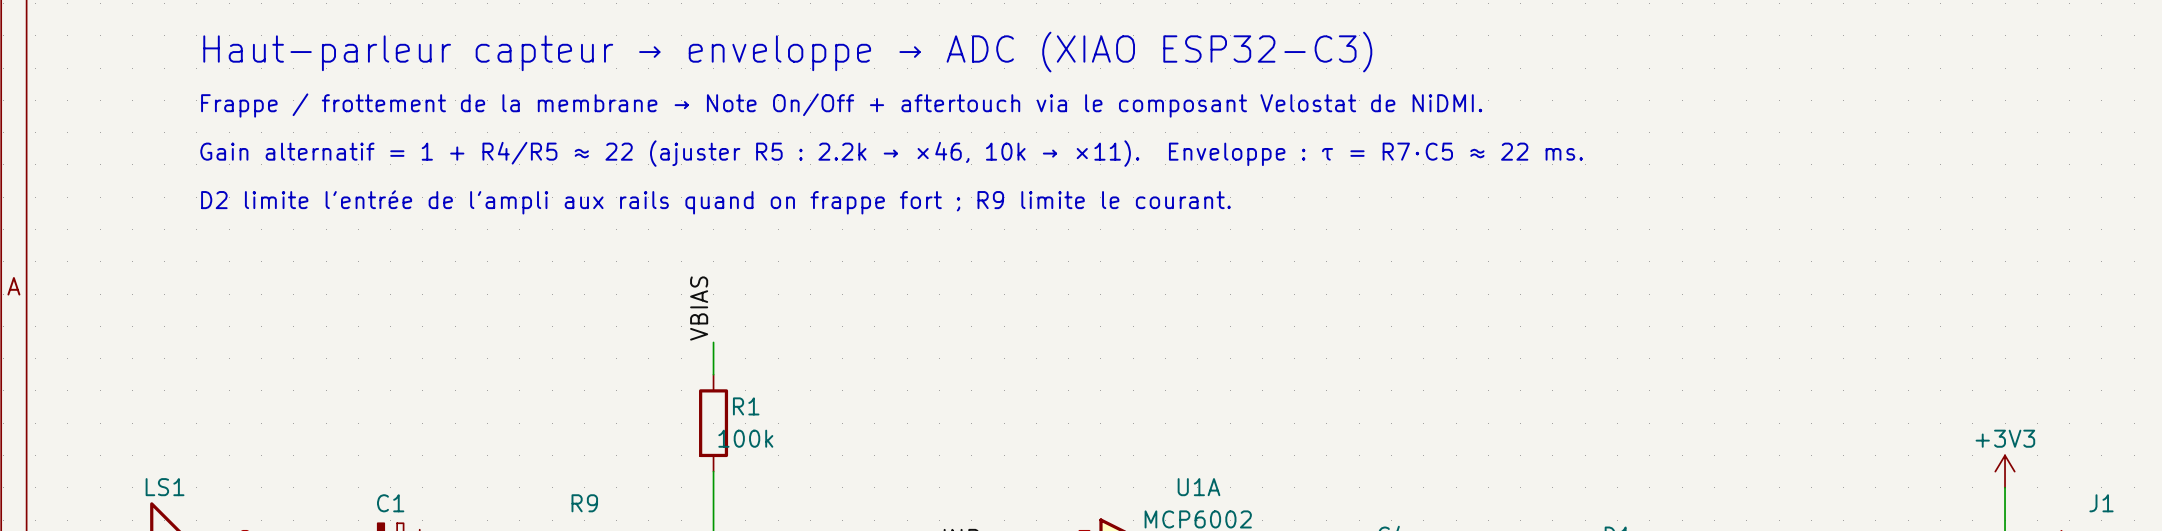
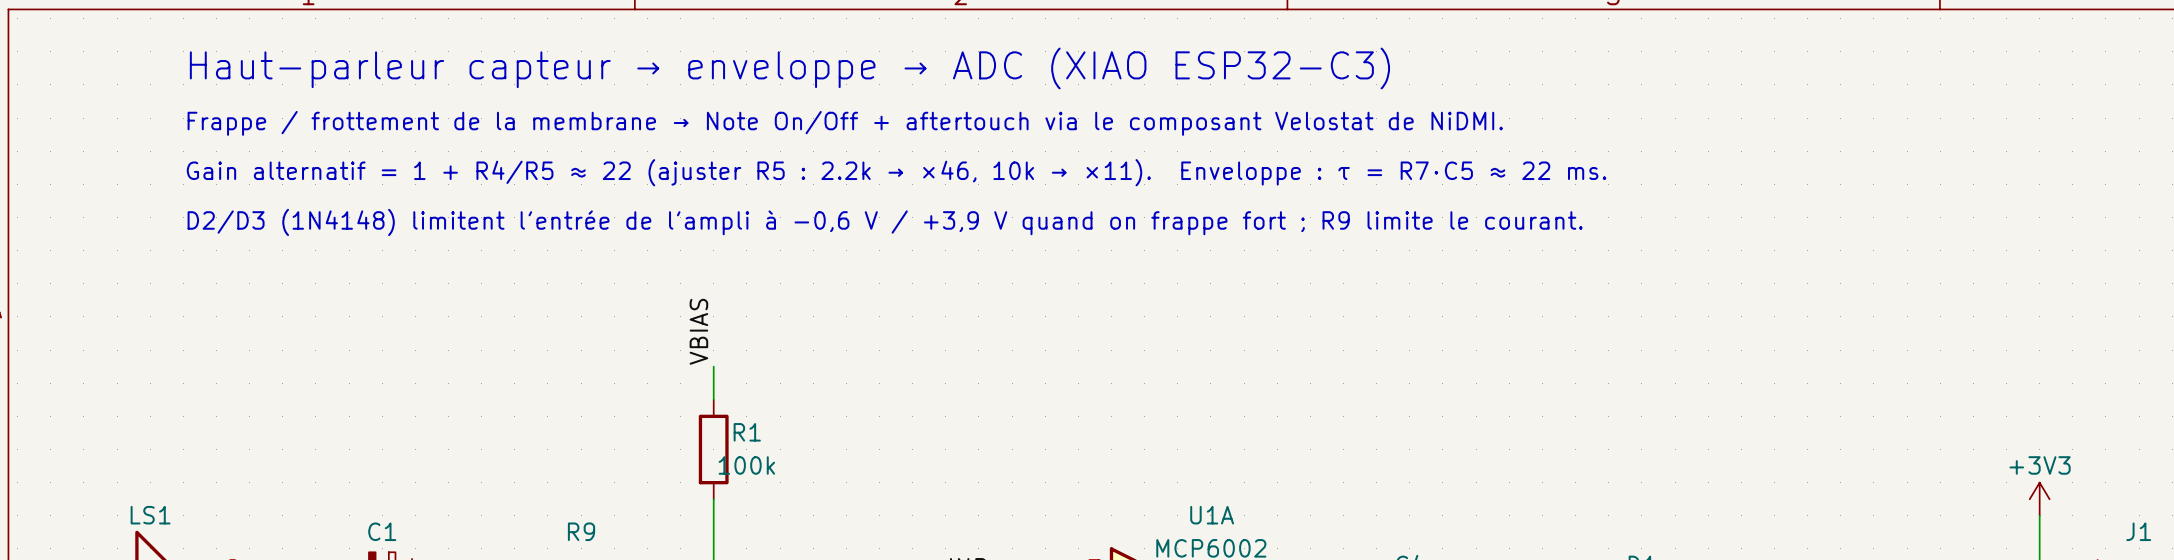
text: D2 limite l'entrée de l'ampli aux rails quand on frappe fort ; R9 limite le courant. (715, 202) -> D2/D3 (1N4148) limitent l'entrée de l'ampli à −0,6 V / +3,9 V quand on frappe fort ; R9 limite le courant. (885, 222)

